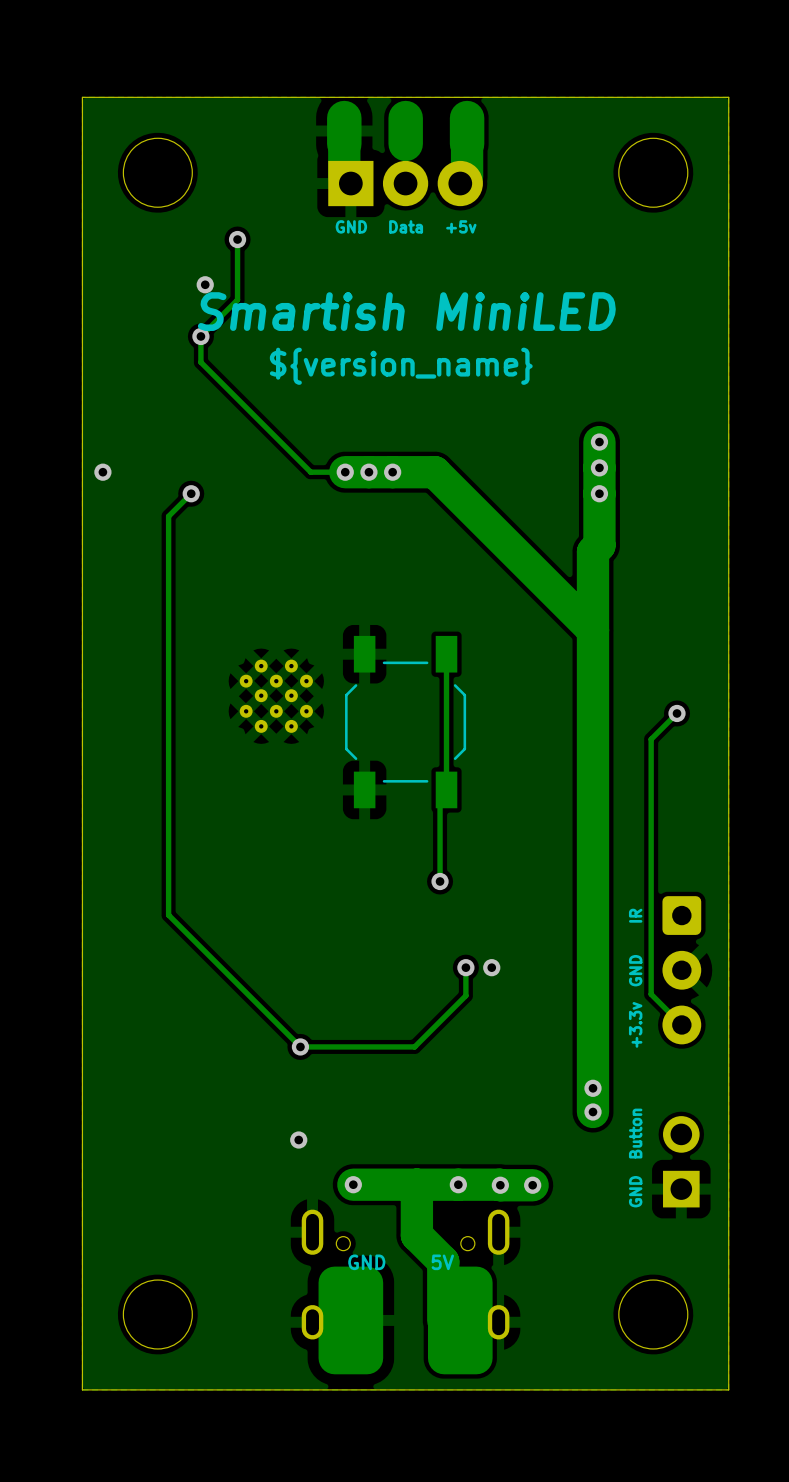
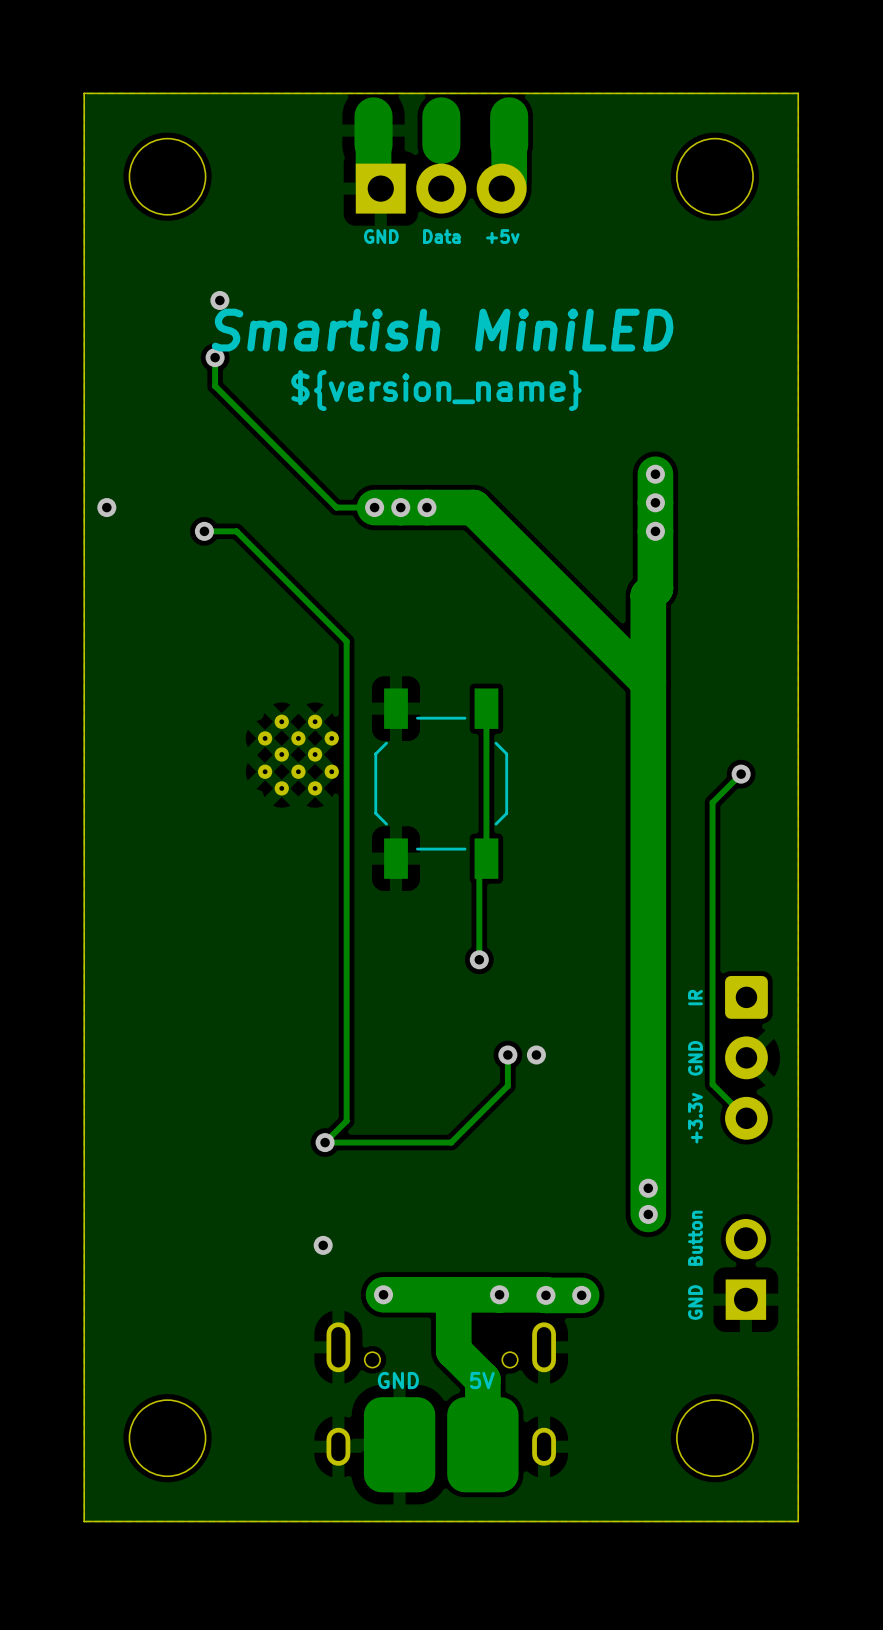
track: (237, 239) (237, 299) (200, 336) -> none
via: (237, 239) -> none
track: (191, 493) (168, 516) (168, 915) (300, 1046) -> (204, 531) (236, 531) (346, 641) (346, 1121) (325, 1142)
part footprint: [318, 1266, 493, 1375] -> [363, 1397, 519, 1493]

